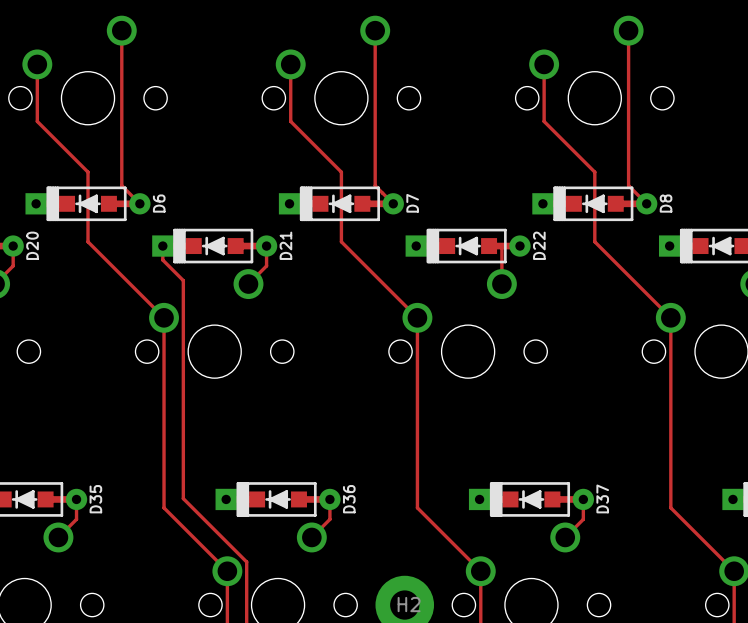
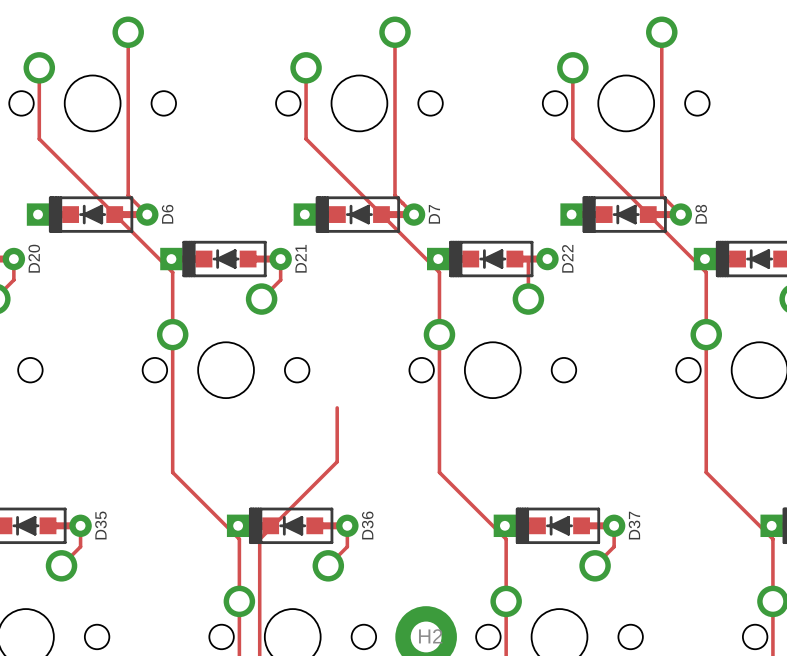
track: (37, 121) (88, 172) (88, 241) (164, 317) -> (39, 127) (39, 138) (172, 272) (172, 334)
track: (290, 121) (341, 172) (341, 241) (417, 317) -> (306, 127) (306, 138) (439, 272) (439, 334)
track: (544, 121) (594, 172) (594, 241) (670, 317) -> (572, 127) (572, 138) (706, 272) (706, 334)
track: (162, 246) (162, 260) (183, 280) (183, 498) (246, 561) -> (337, 407) (337, 461) (259, 539) (259, 591)
track: (164, 448) (164, 507) (227, 571) -> (172, 472) (239, 539) (239, 601)
track: (417, 448) (417, 507) (480, 571) -> (439, 472) (506, 539) (506, 601)
track: (670, 448) (670, 507) (734, 571) -> (706, 472) (772, 539) (772, 601)

